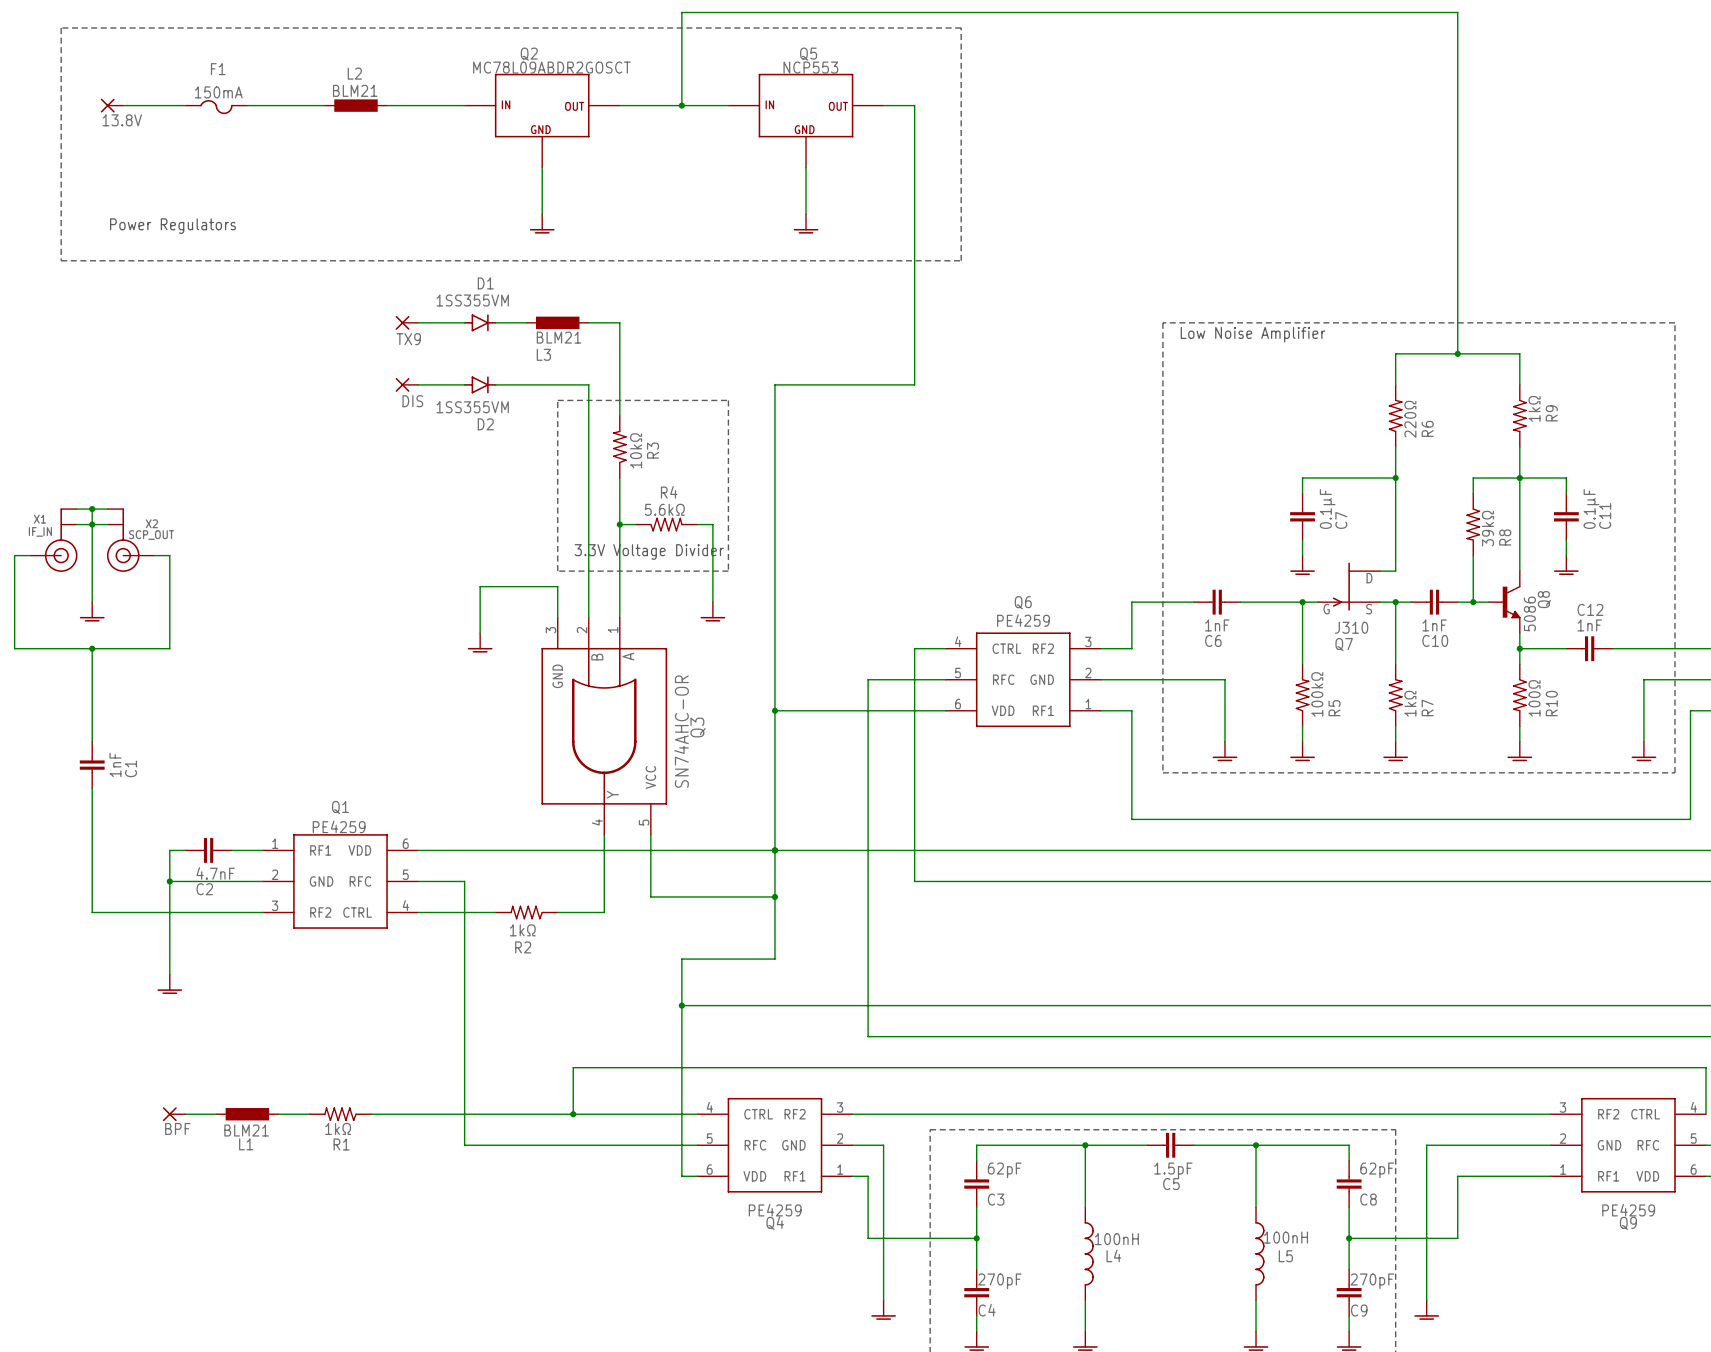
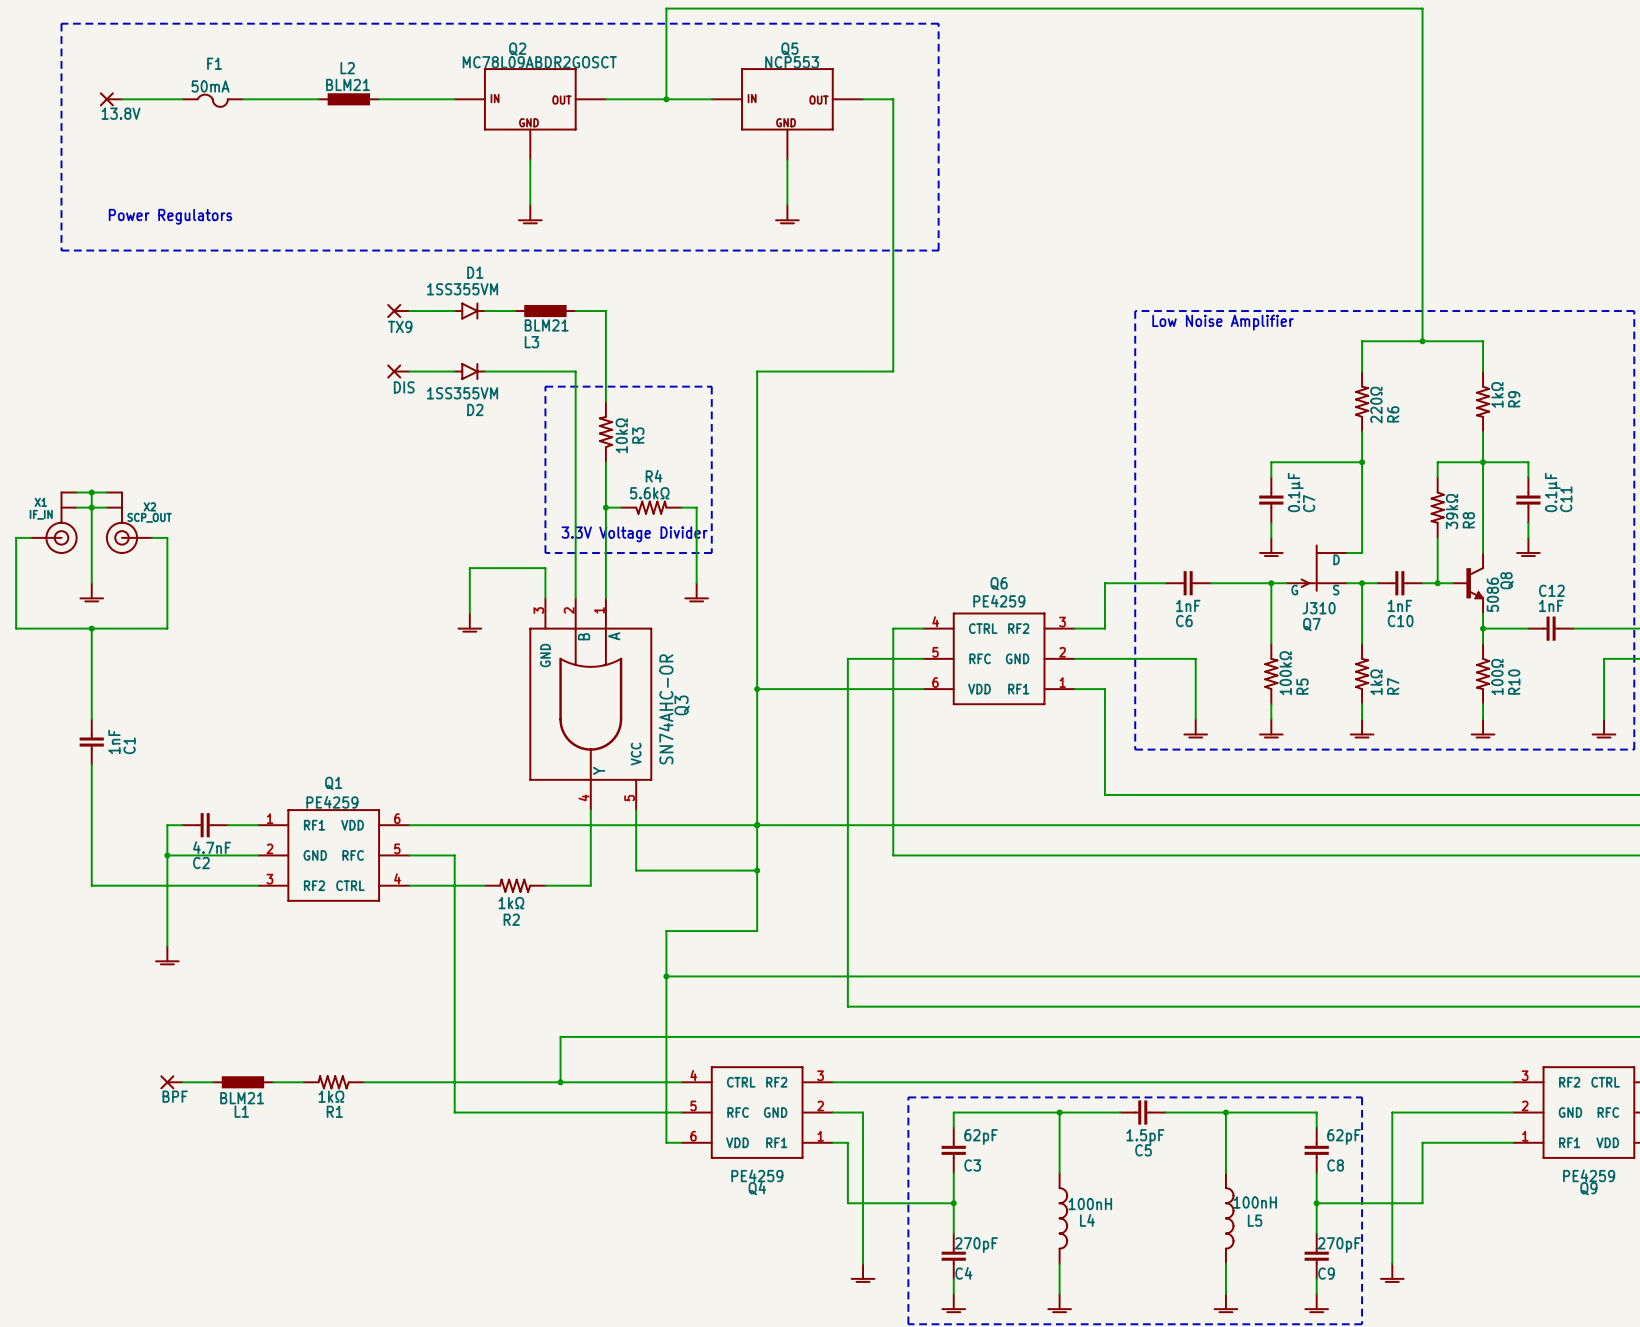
F1 value: 150mA (218, 92) -> 50mA (210, 86)

